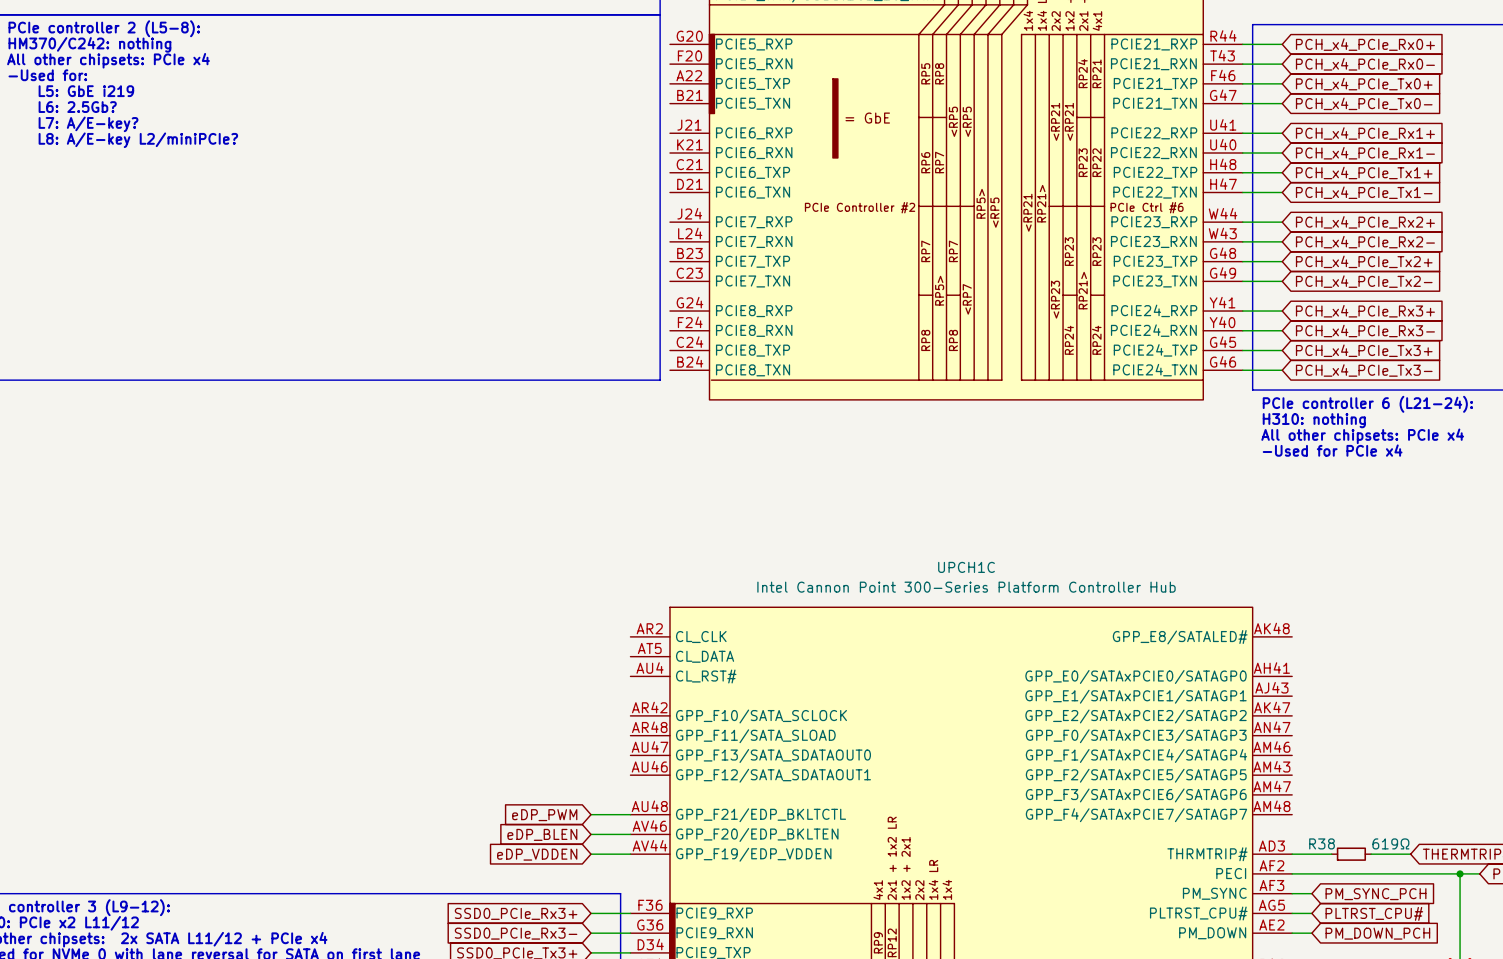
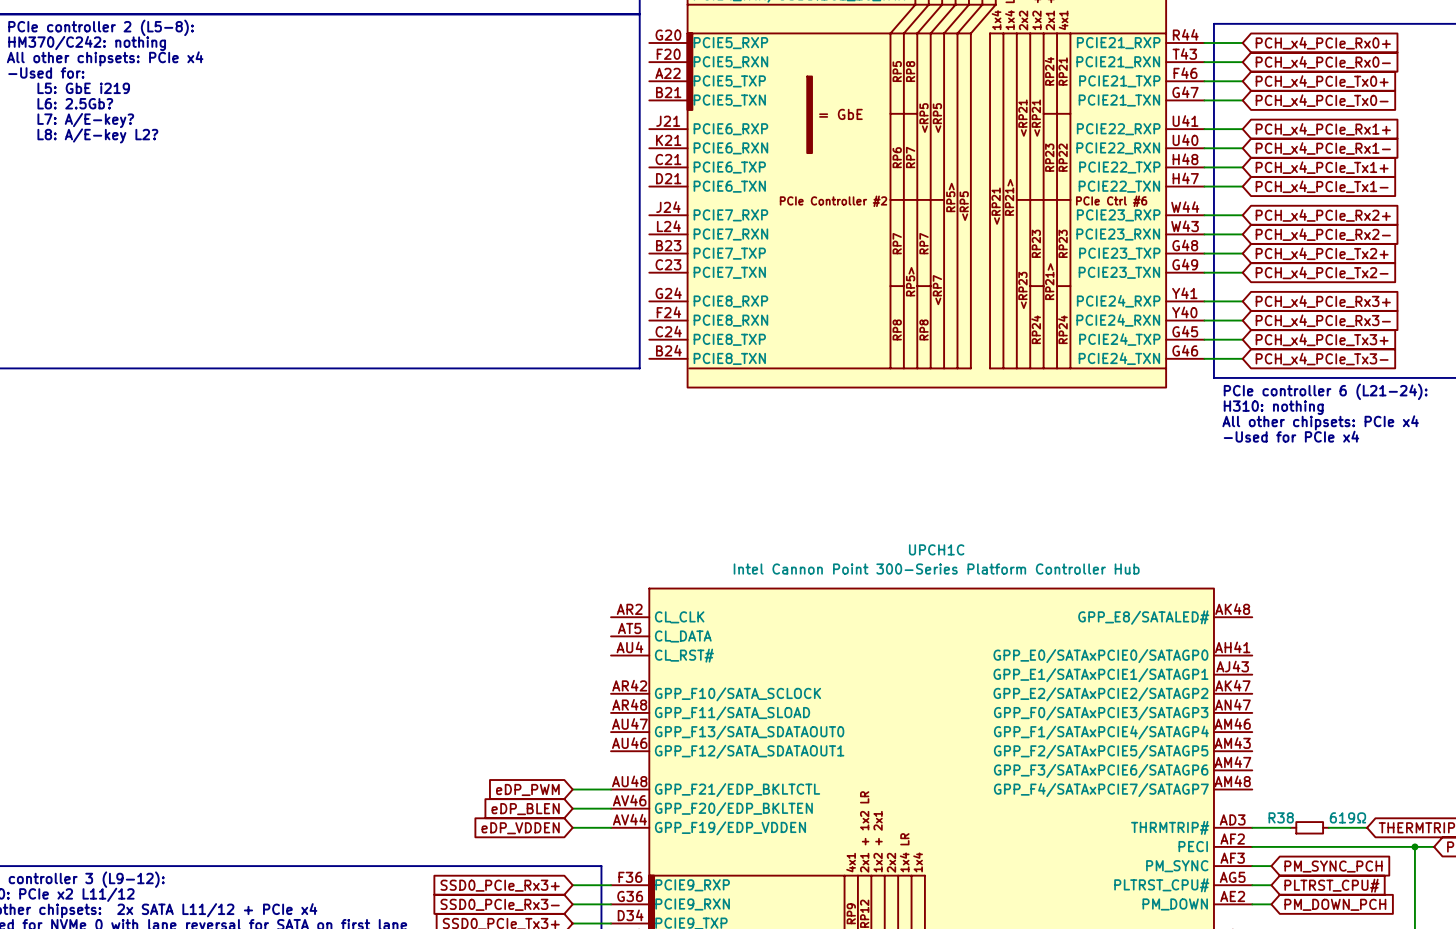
text: L8: A/E-key L2/miniPCIe? (138, 140) -> L8: A/E-key L2? (97, 135)

